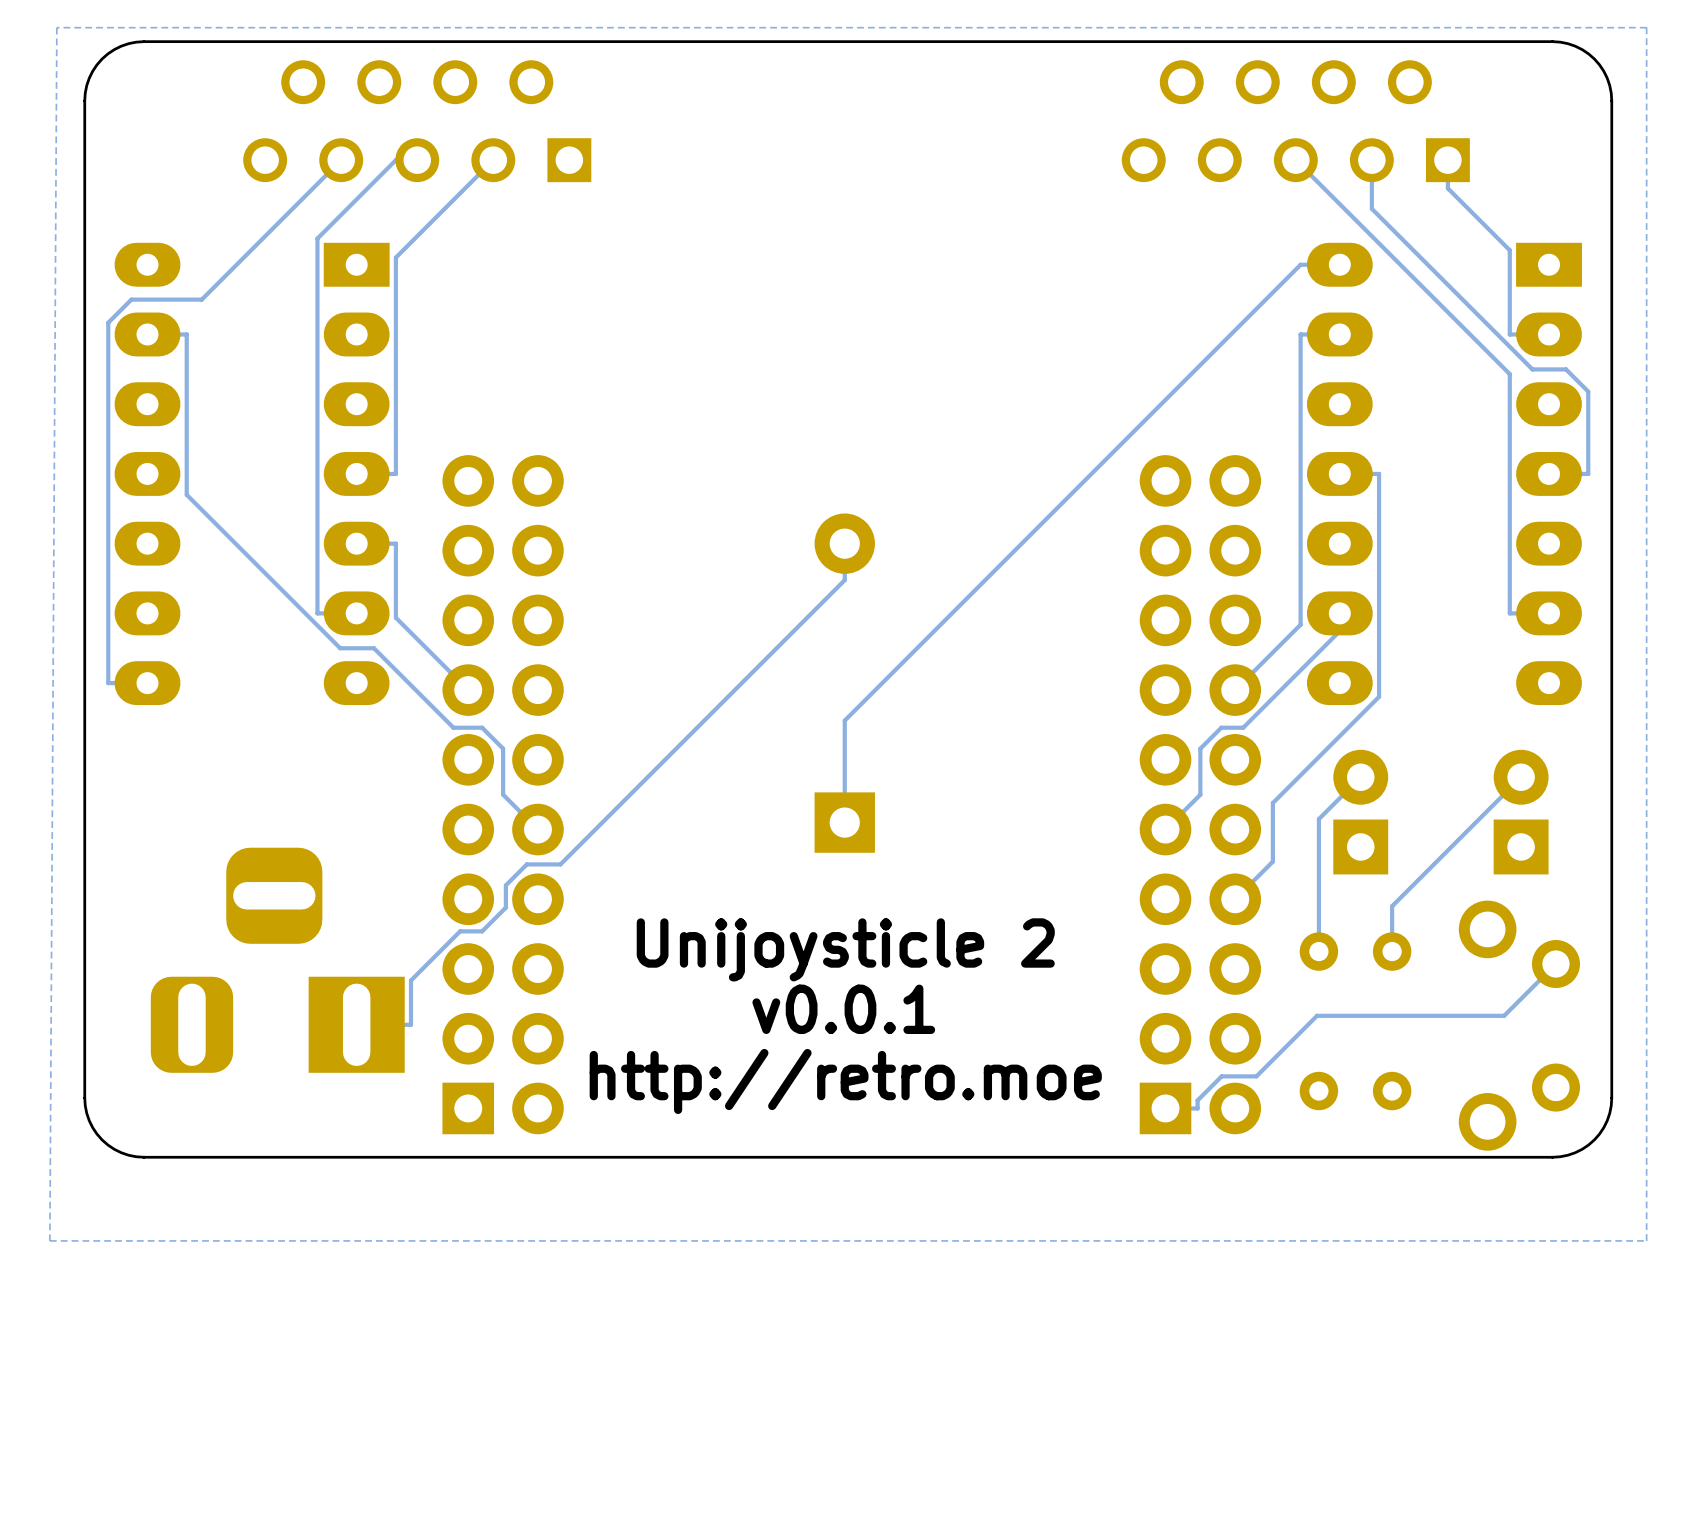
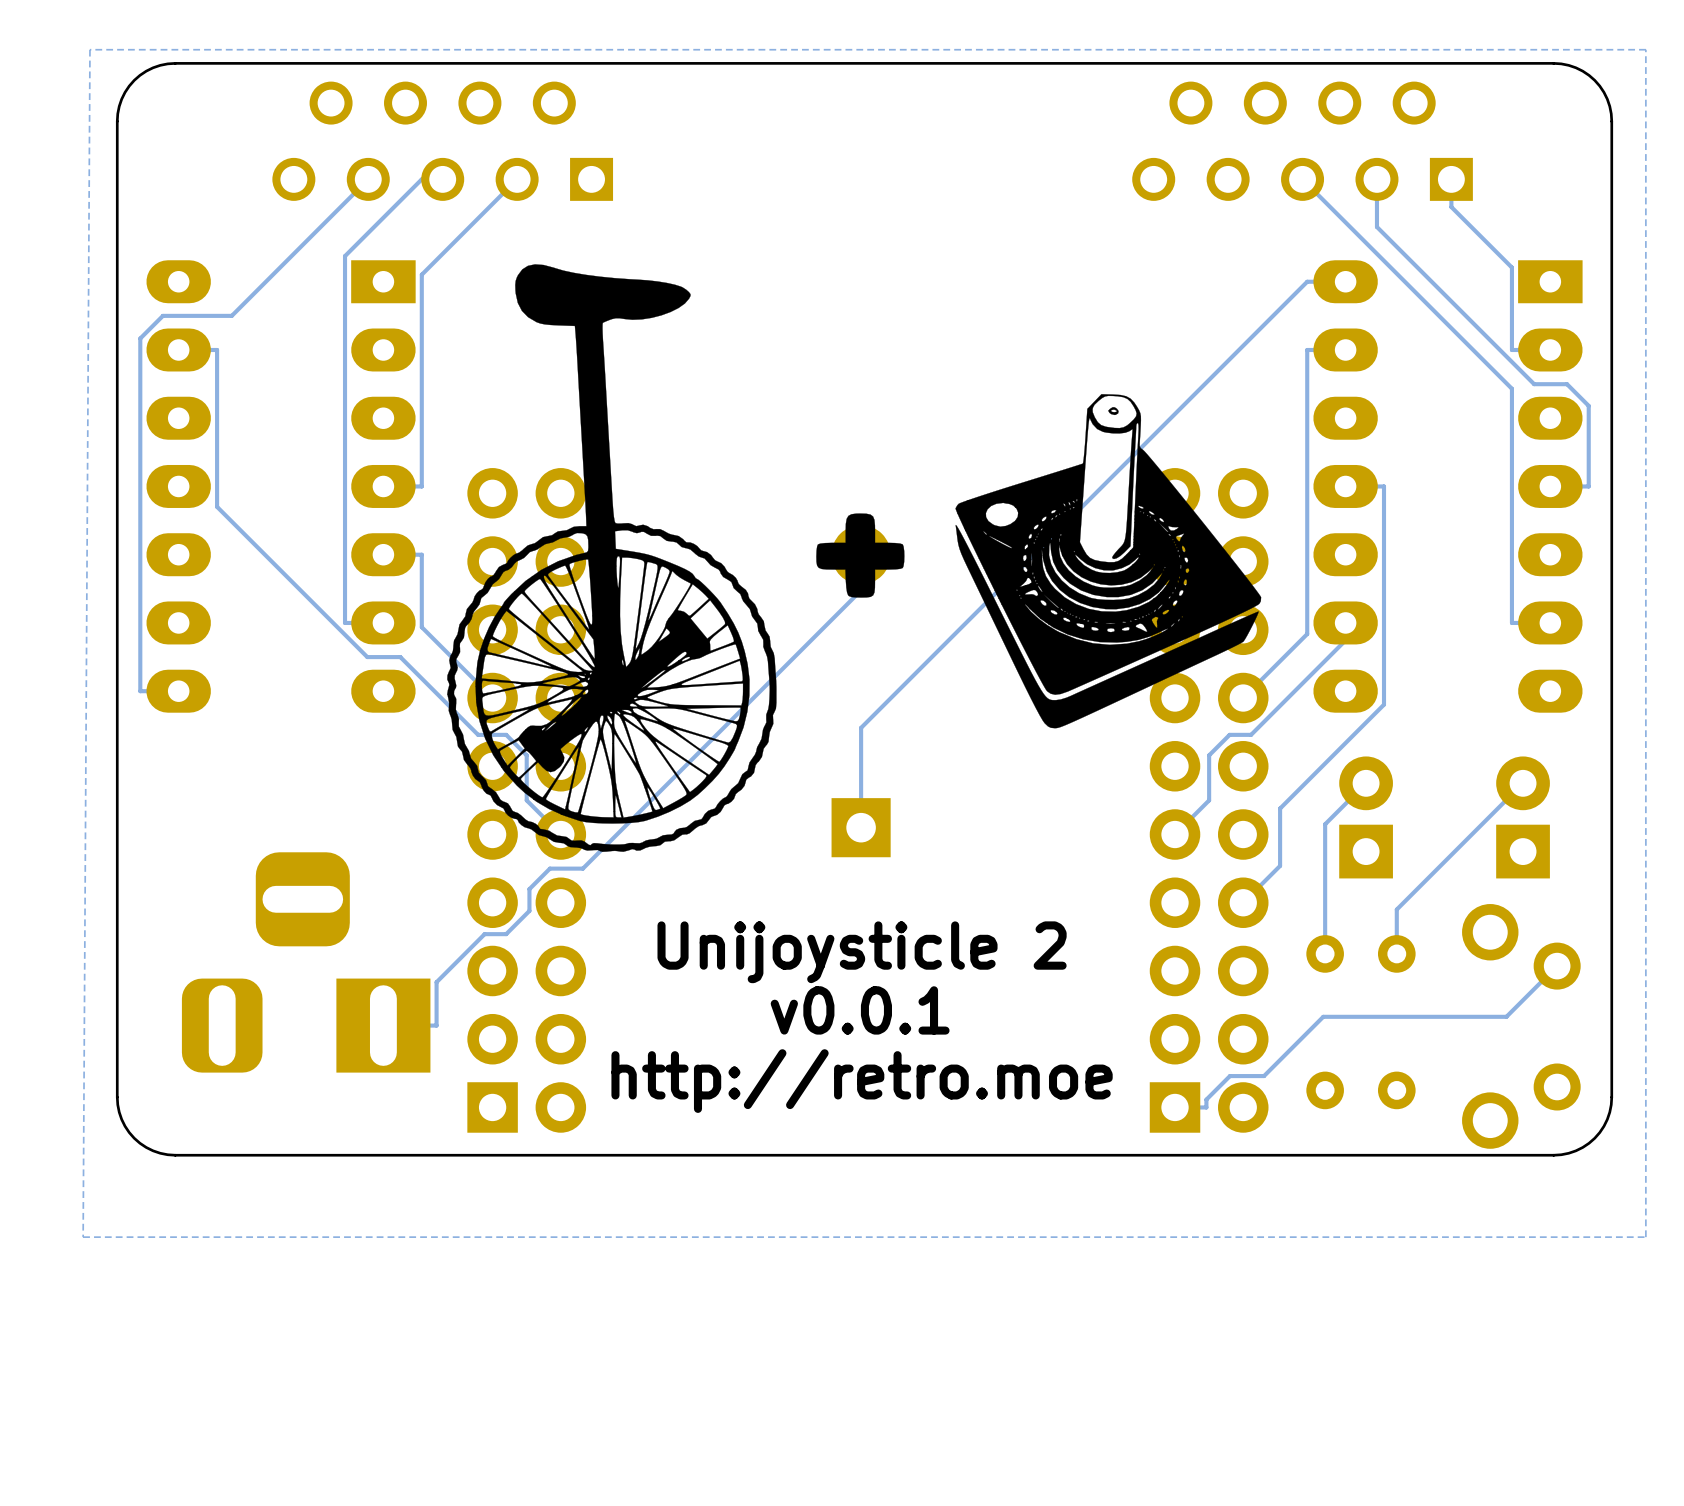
drawing: none -> [447, 264, 1262, 852]

